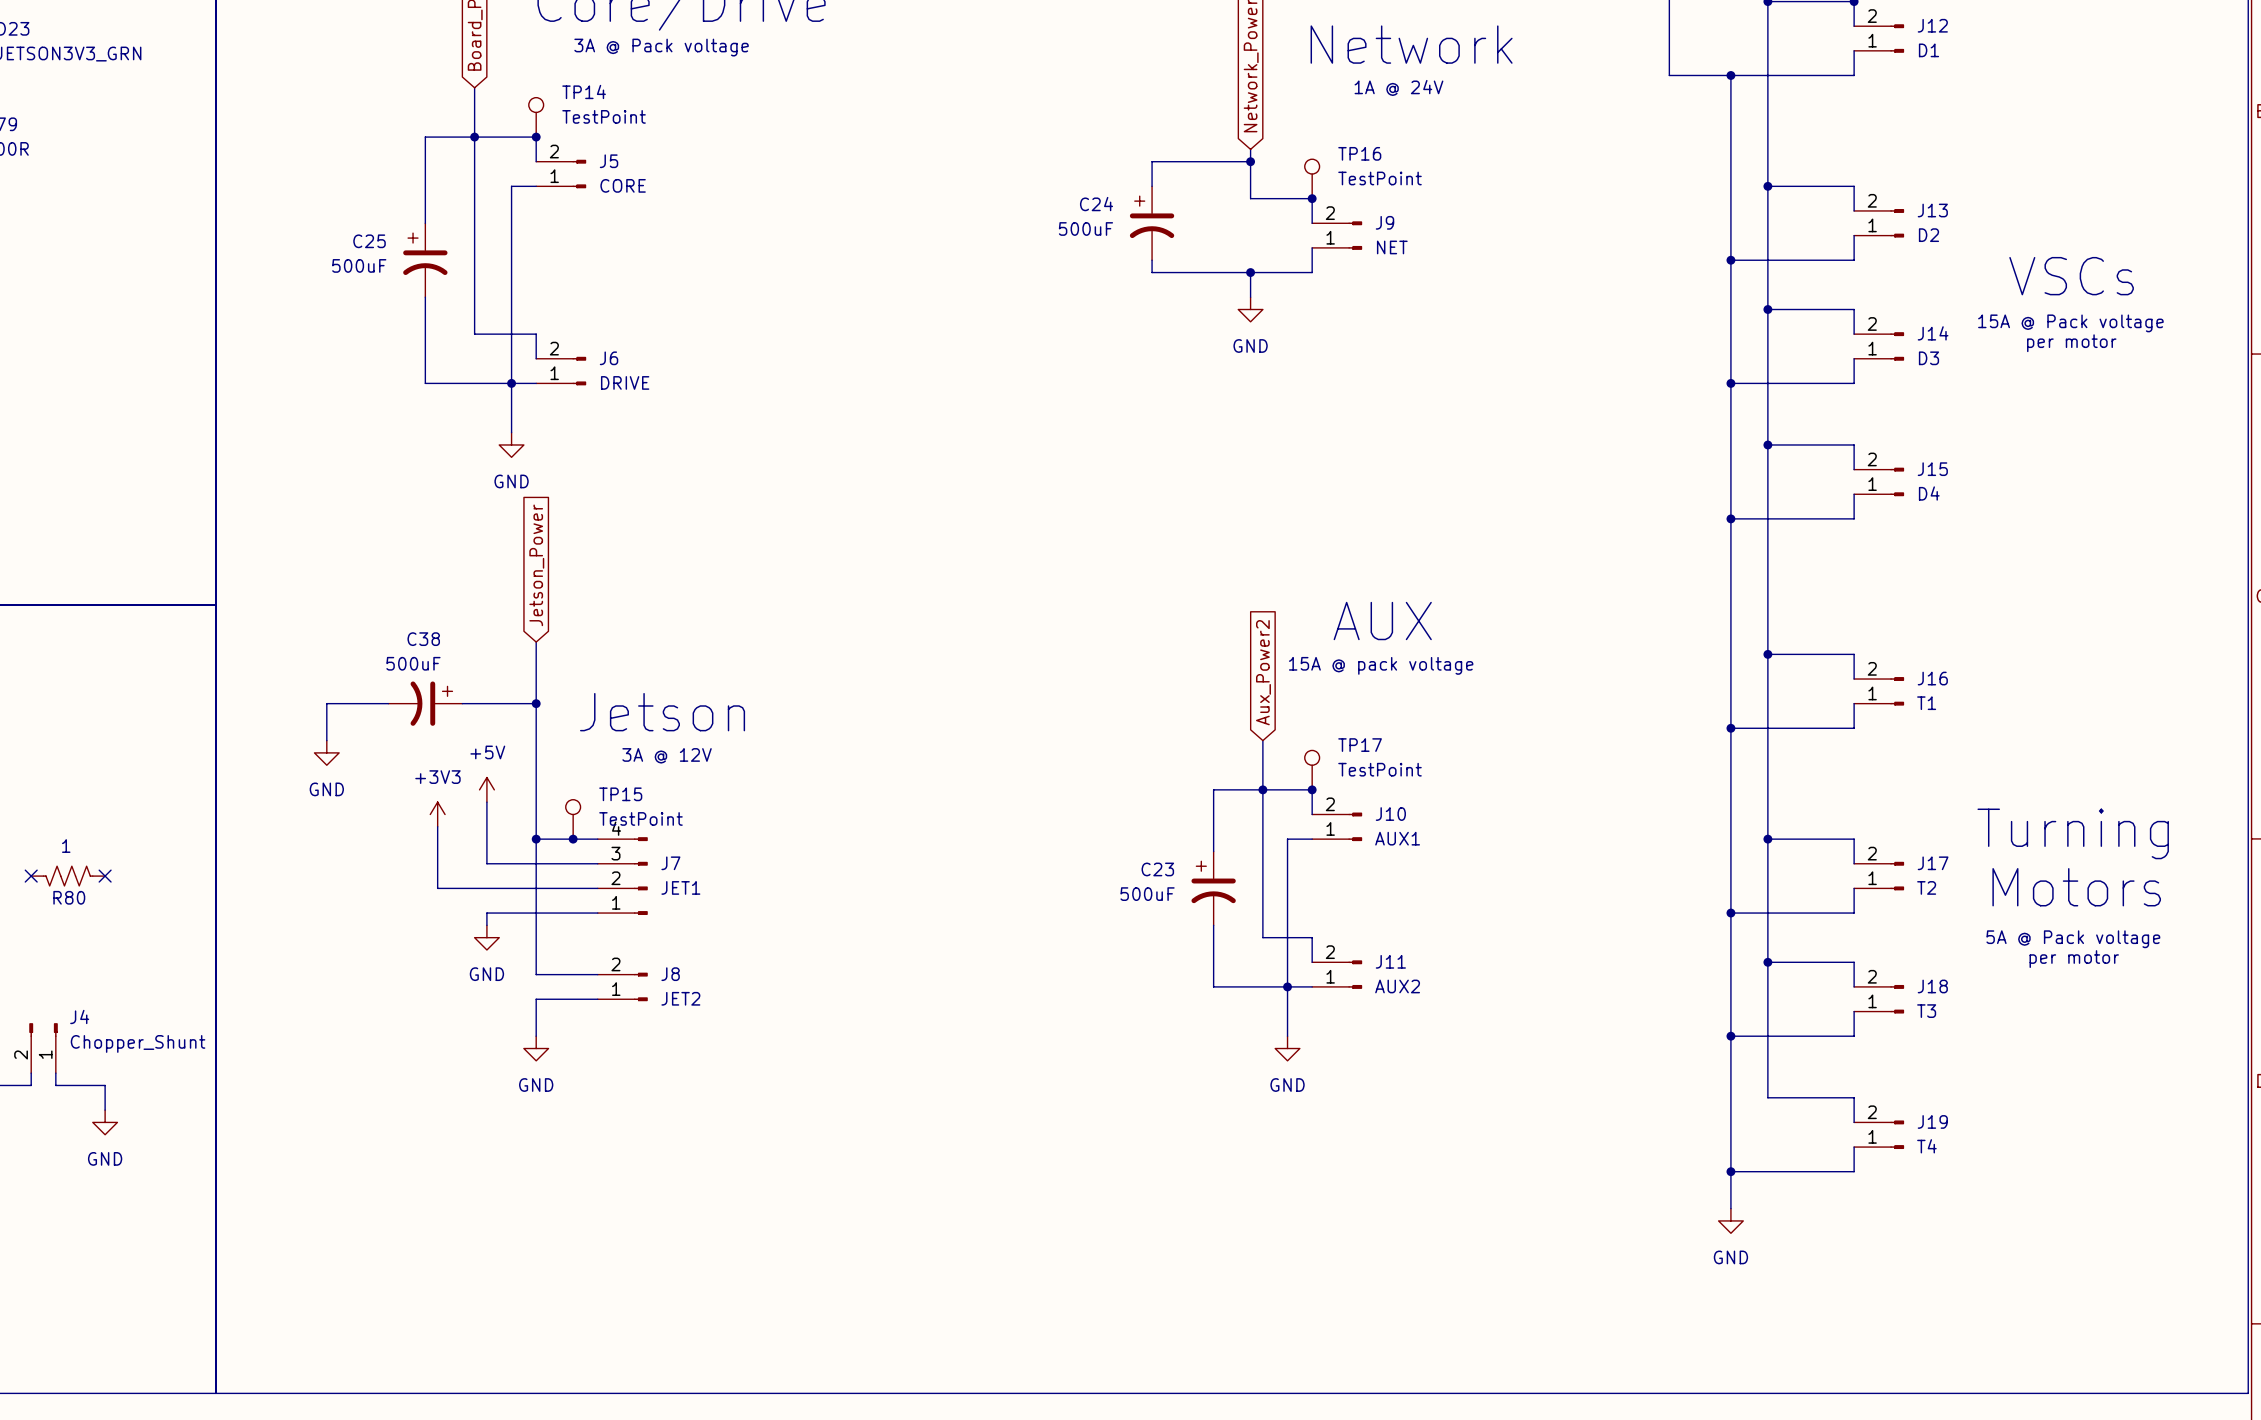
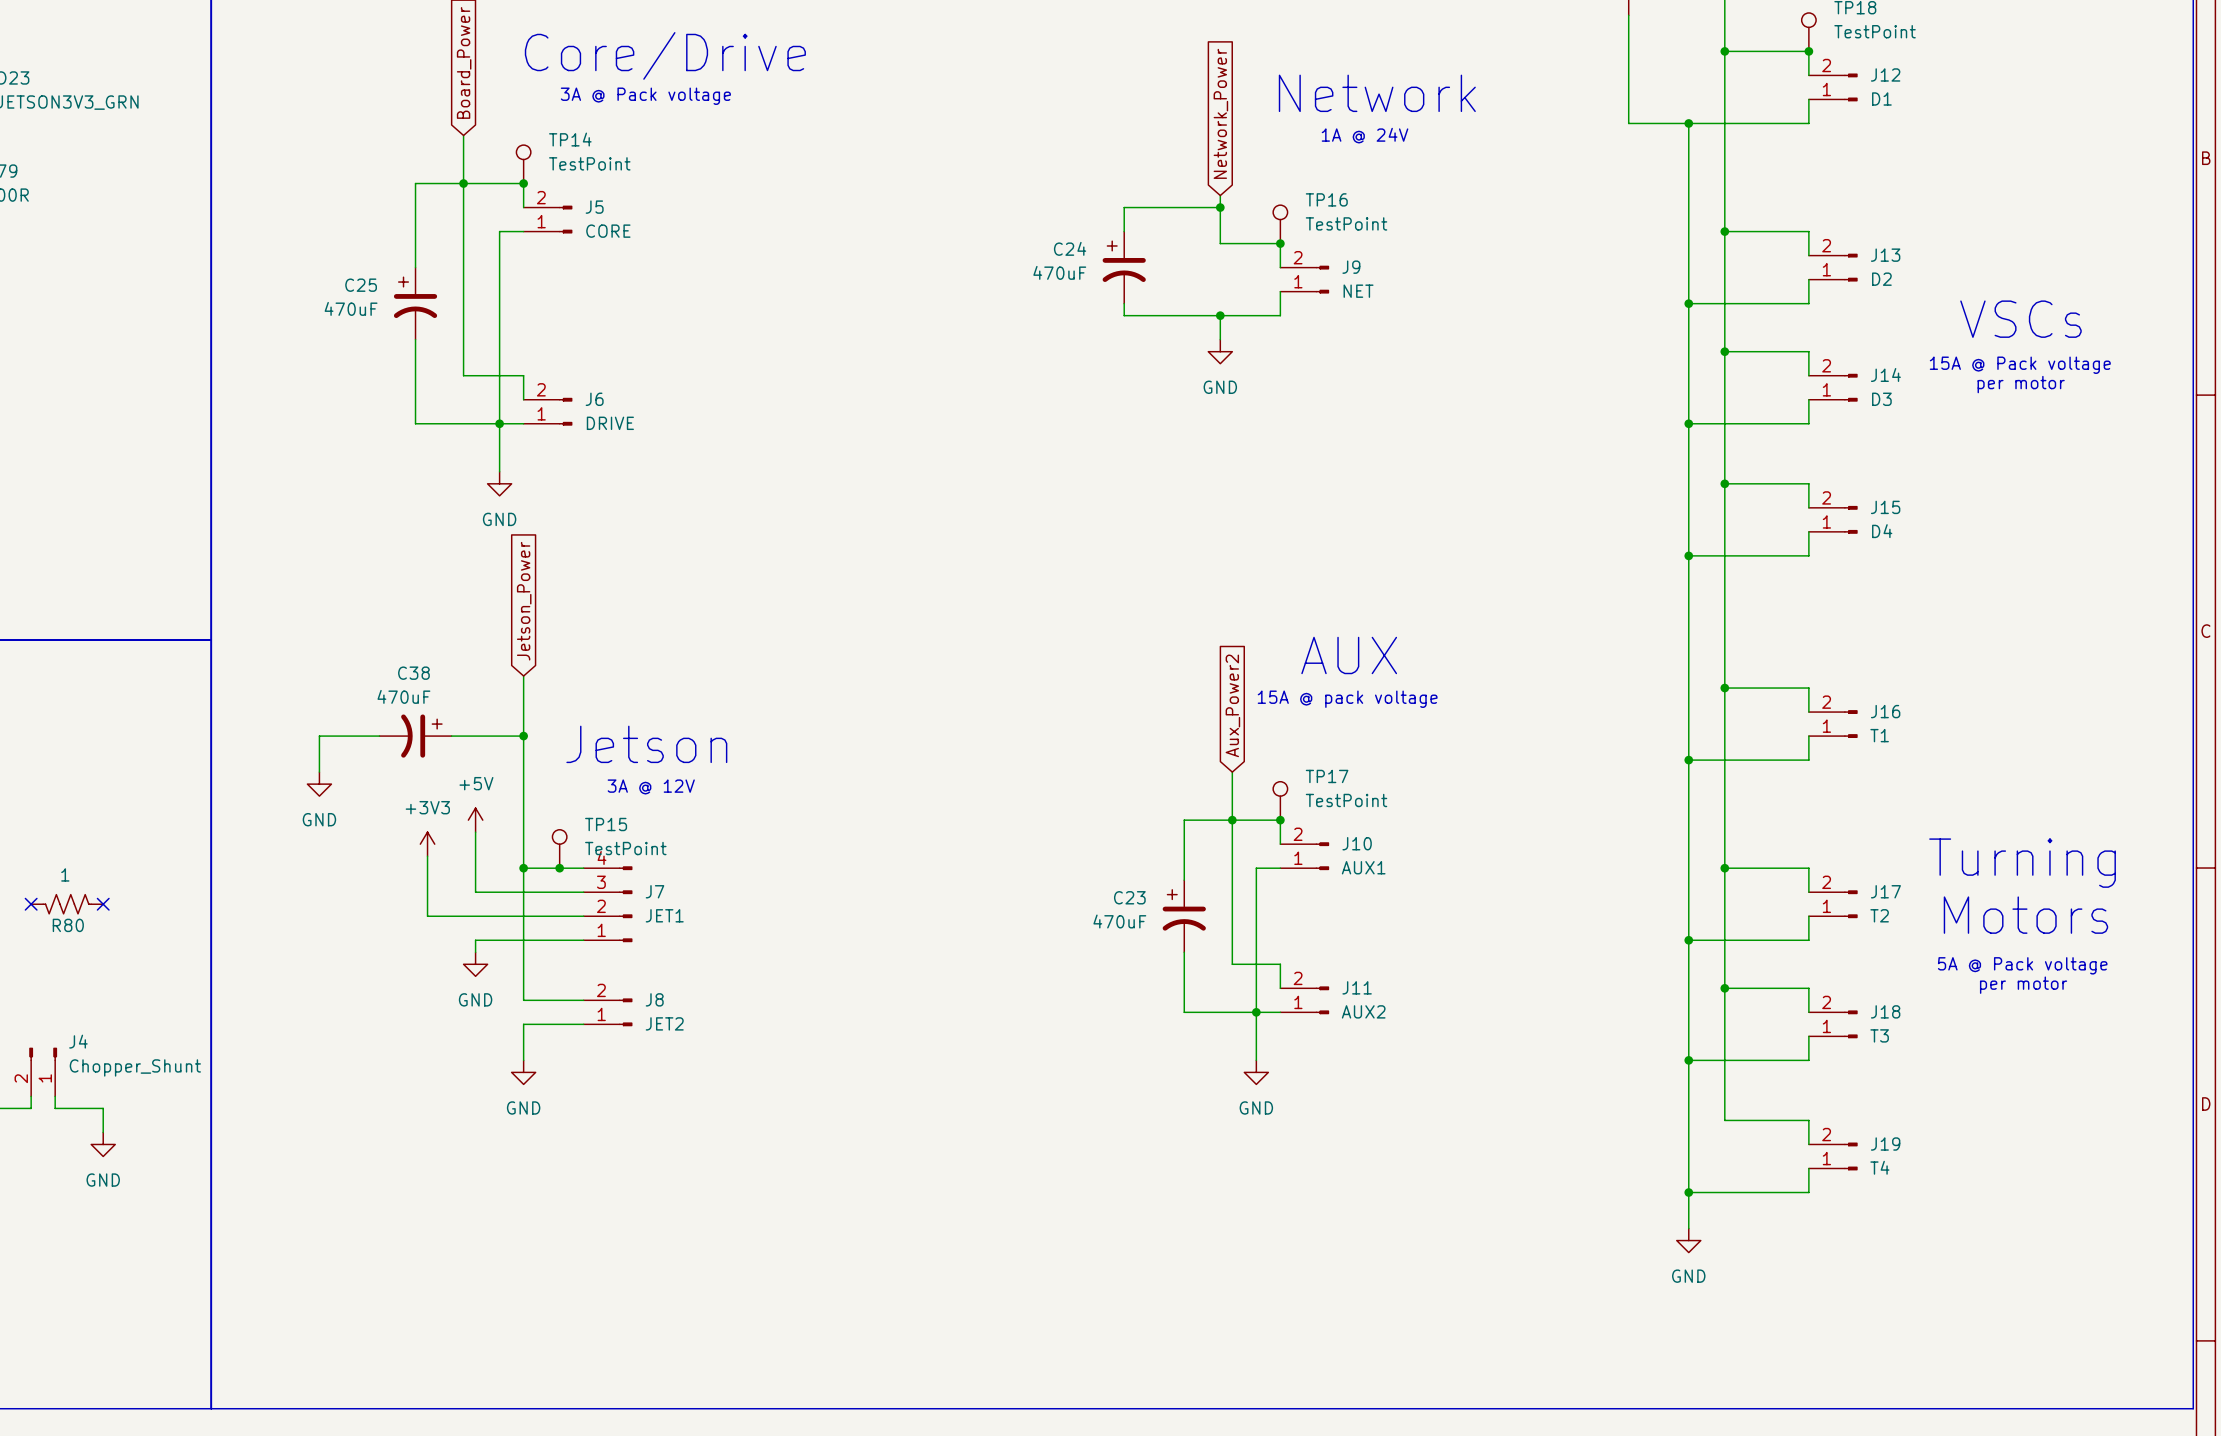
C24 value: 500uF (1085, 228) -> 470uF (1059, 272)
C25 value: 500uF (359, 265) -> 470uF (351, 308)
C38 value: 500uF (413, 663) -> 470uF (403, 696)
C23 value: 500uF (1147, 894) -> 470uF (1119, 921)

